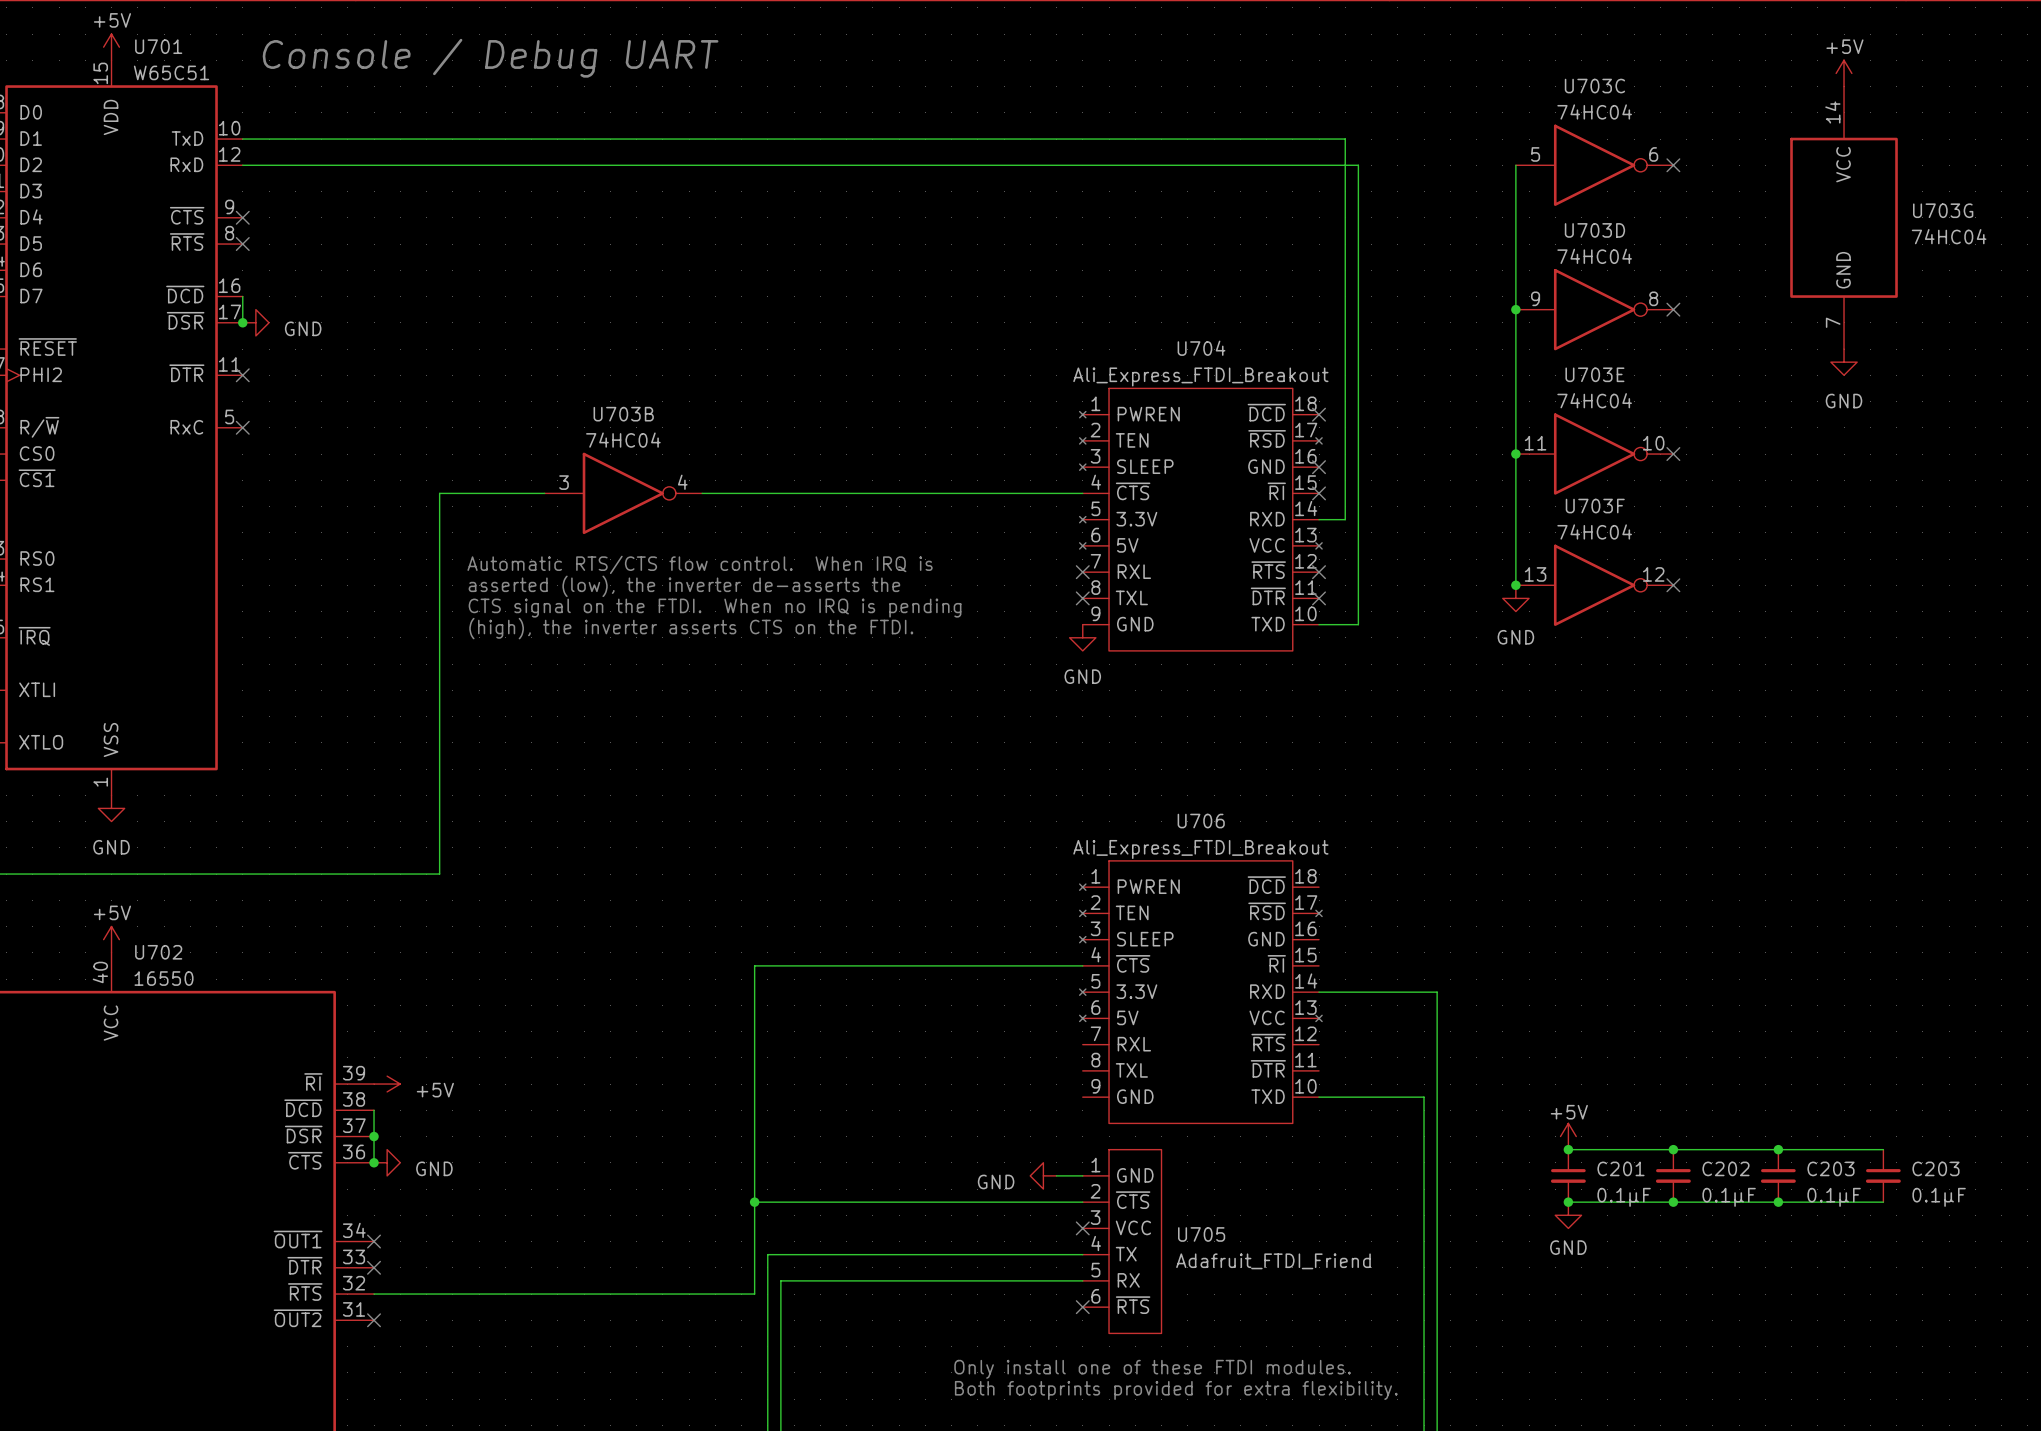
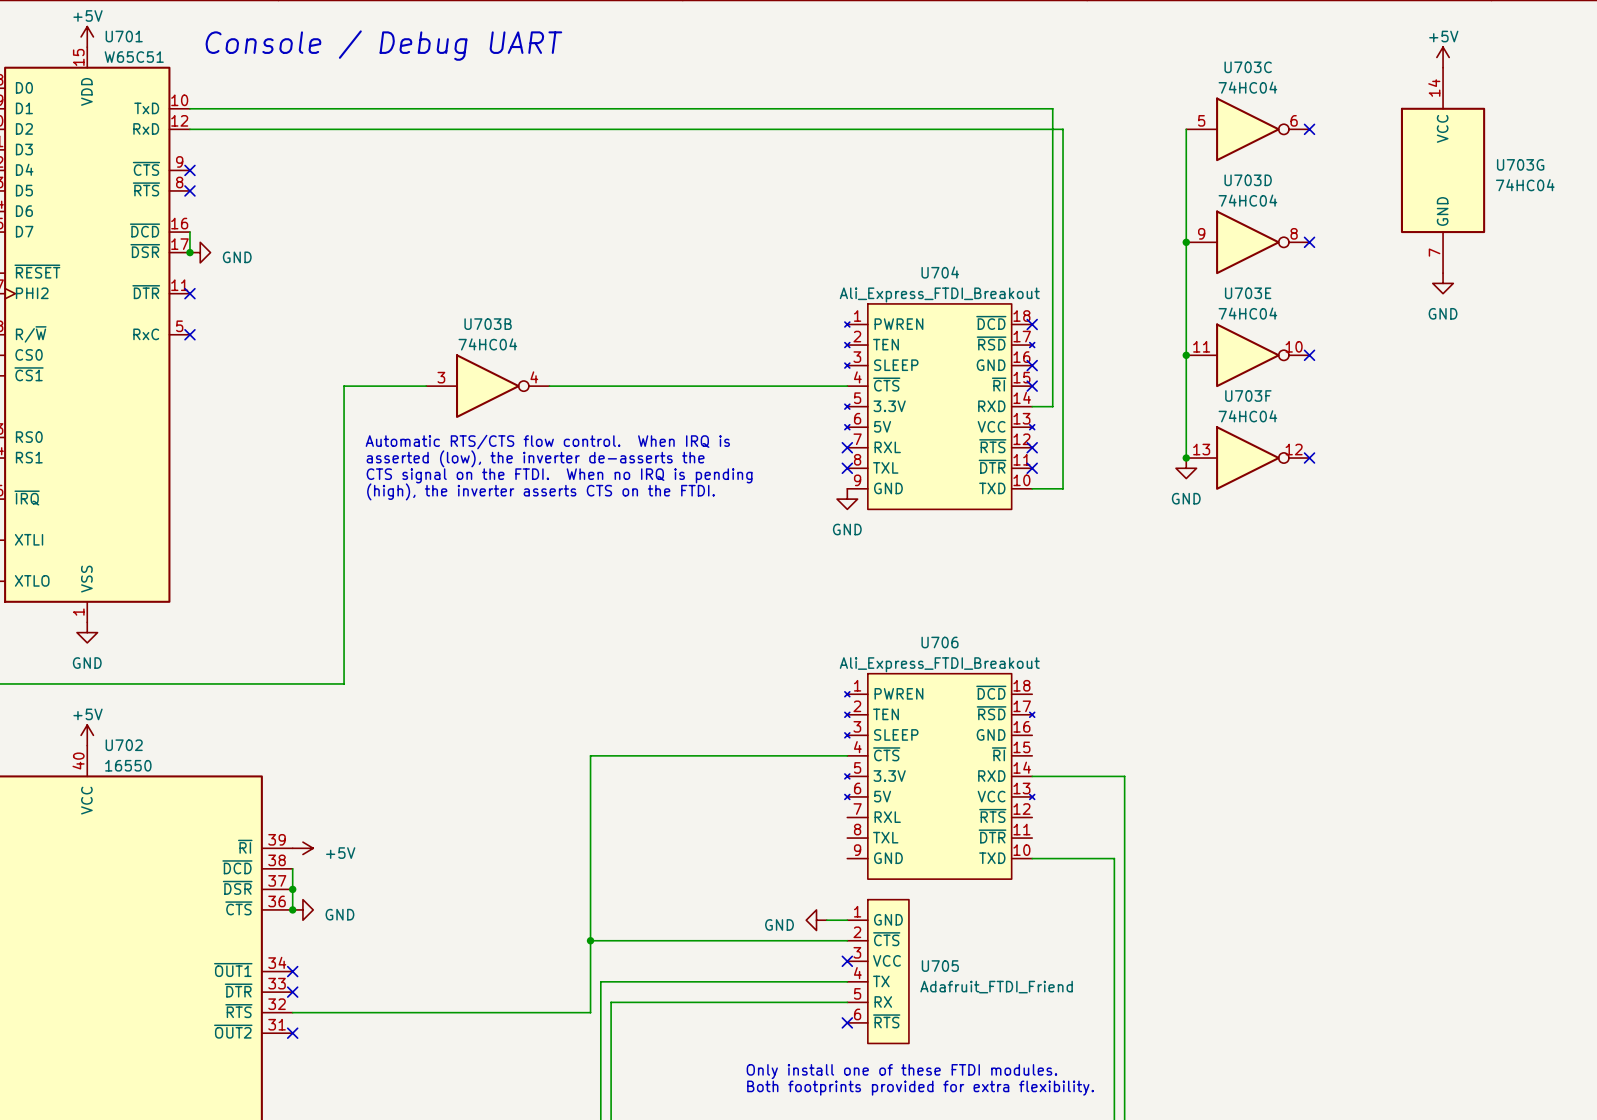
power symbol: +5V (1568, 1136) -> none
wire: (1568, 1149) (1883, 1149) -> none
junction: (1568, 1149) -> none
junction: (1673, 1149) -> none
junction: (1778, 1149) -> none
C201: 0.1µF (1568, 1175) -> none
C202: 0.1µF (1673, 1175) -> none
C203: 0.1µF (1778, 1175) -> none
C203: 0.1µF (1883, 1175) -> none
wire: (1568, 1202) (1883, 1202) -> none
junction: (1568, 1202) -> none
junction: (1673, 1202) -> none
junction: (1778, 1202) -> none
power symbol: GND (1568, 1215) -> none

